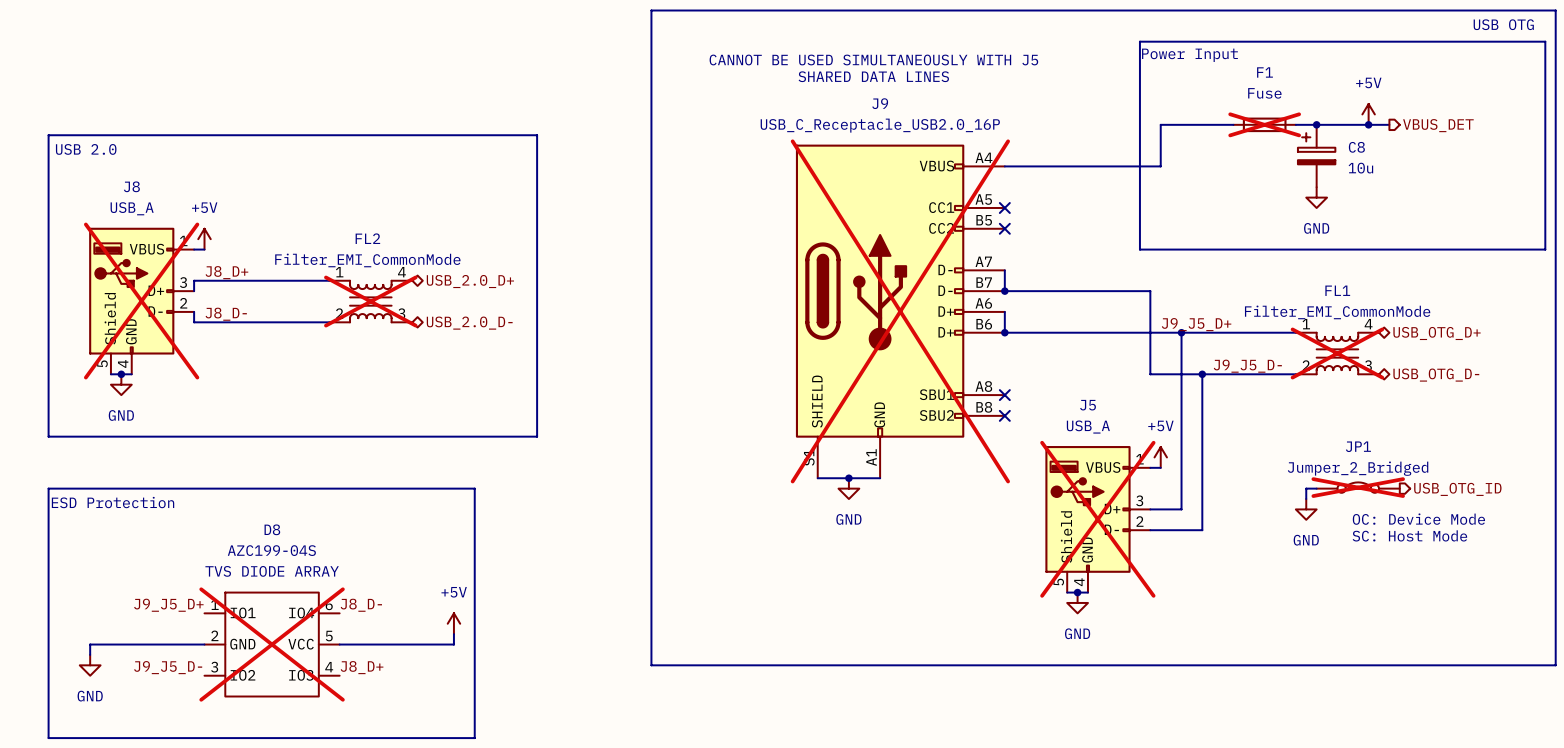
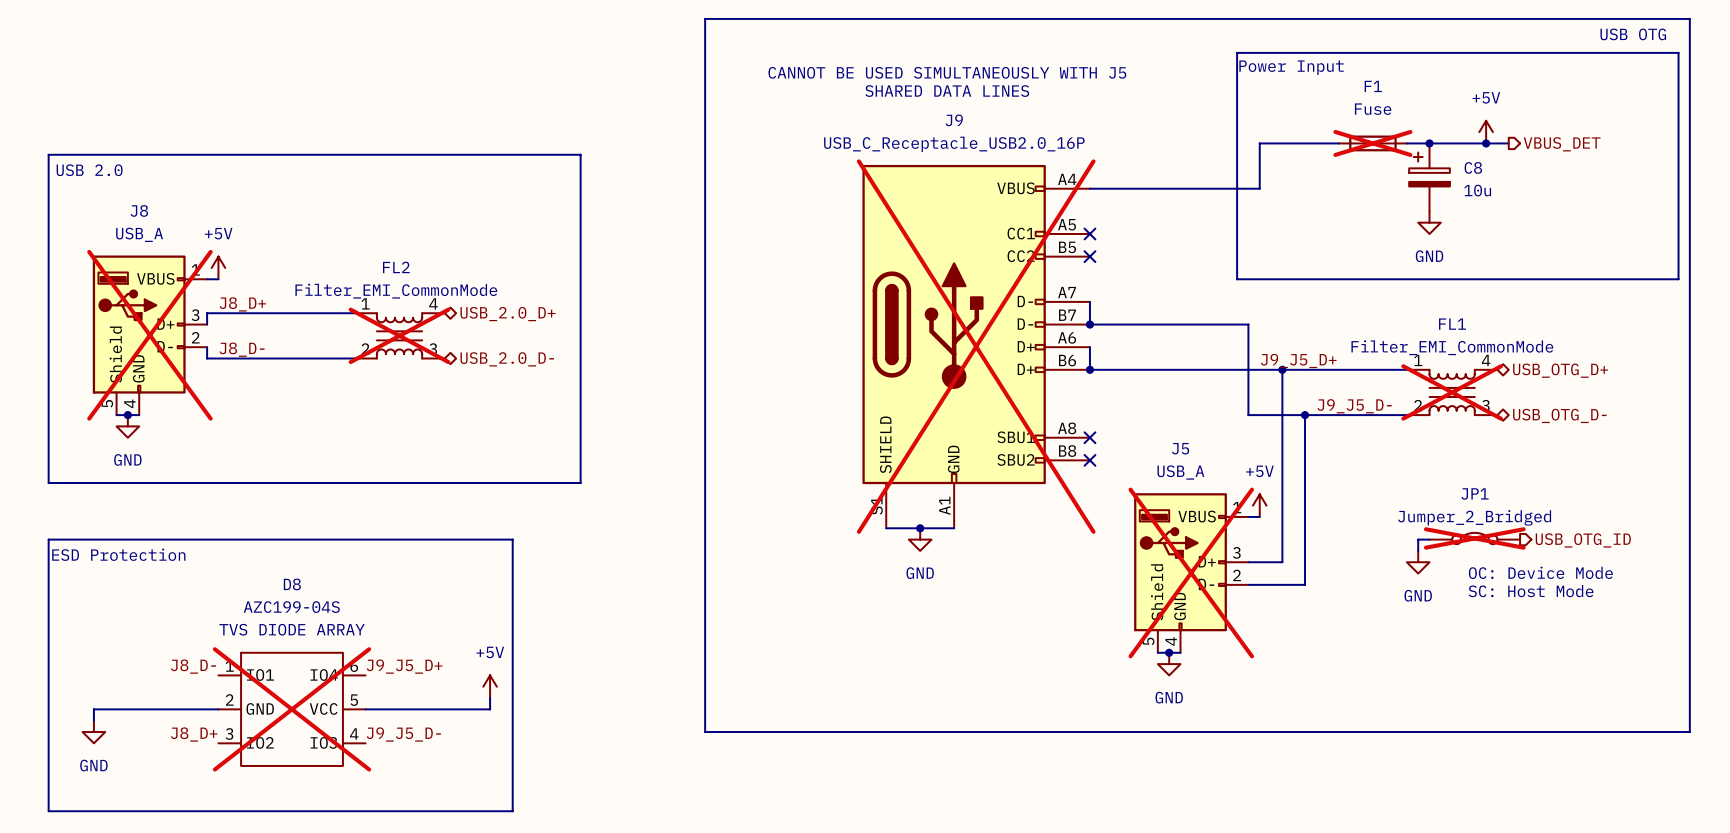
label: J9_J5_D+ (168, 605) -> J8_D- (193, 666)
label: J8_D- (361, 605) -> J9_J5_D+ (404, 666)
label: J9_J5_D- (168, 667) -> J8_D+ (194, 734)
label: J8_D+ (362, 667) -> J9_J5_D- (403, 734)

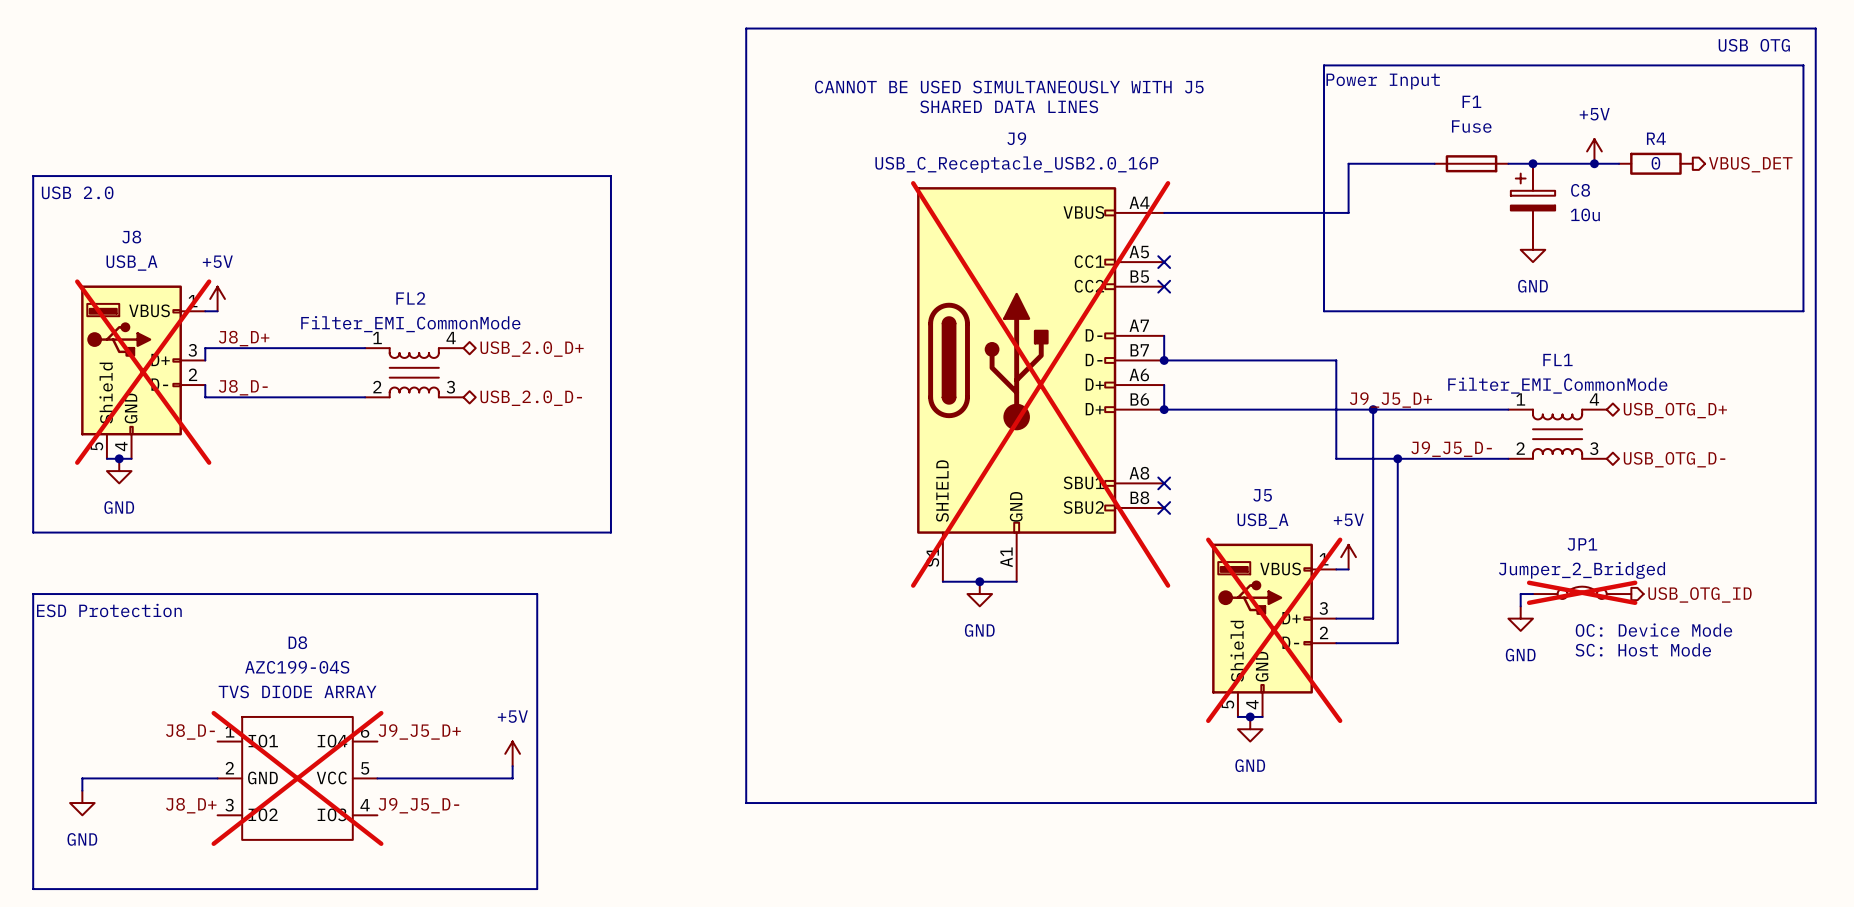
F1 do-not-place cross: (1372, 143) -> none
R4: none -> 0 (1655, 163)
hierarchical label position: VBUS_DET (1562, 144) -> VBUS_DET (1750, 164)
FL2 do-not-place cross: (399, 335) -> none
FL1 do-not-place cross: (1452, 392) -> none

